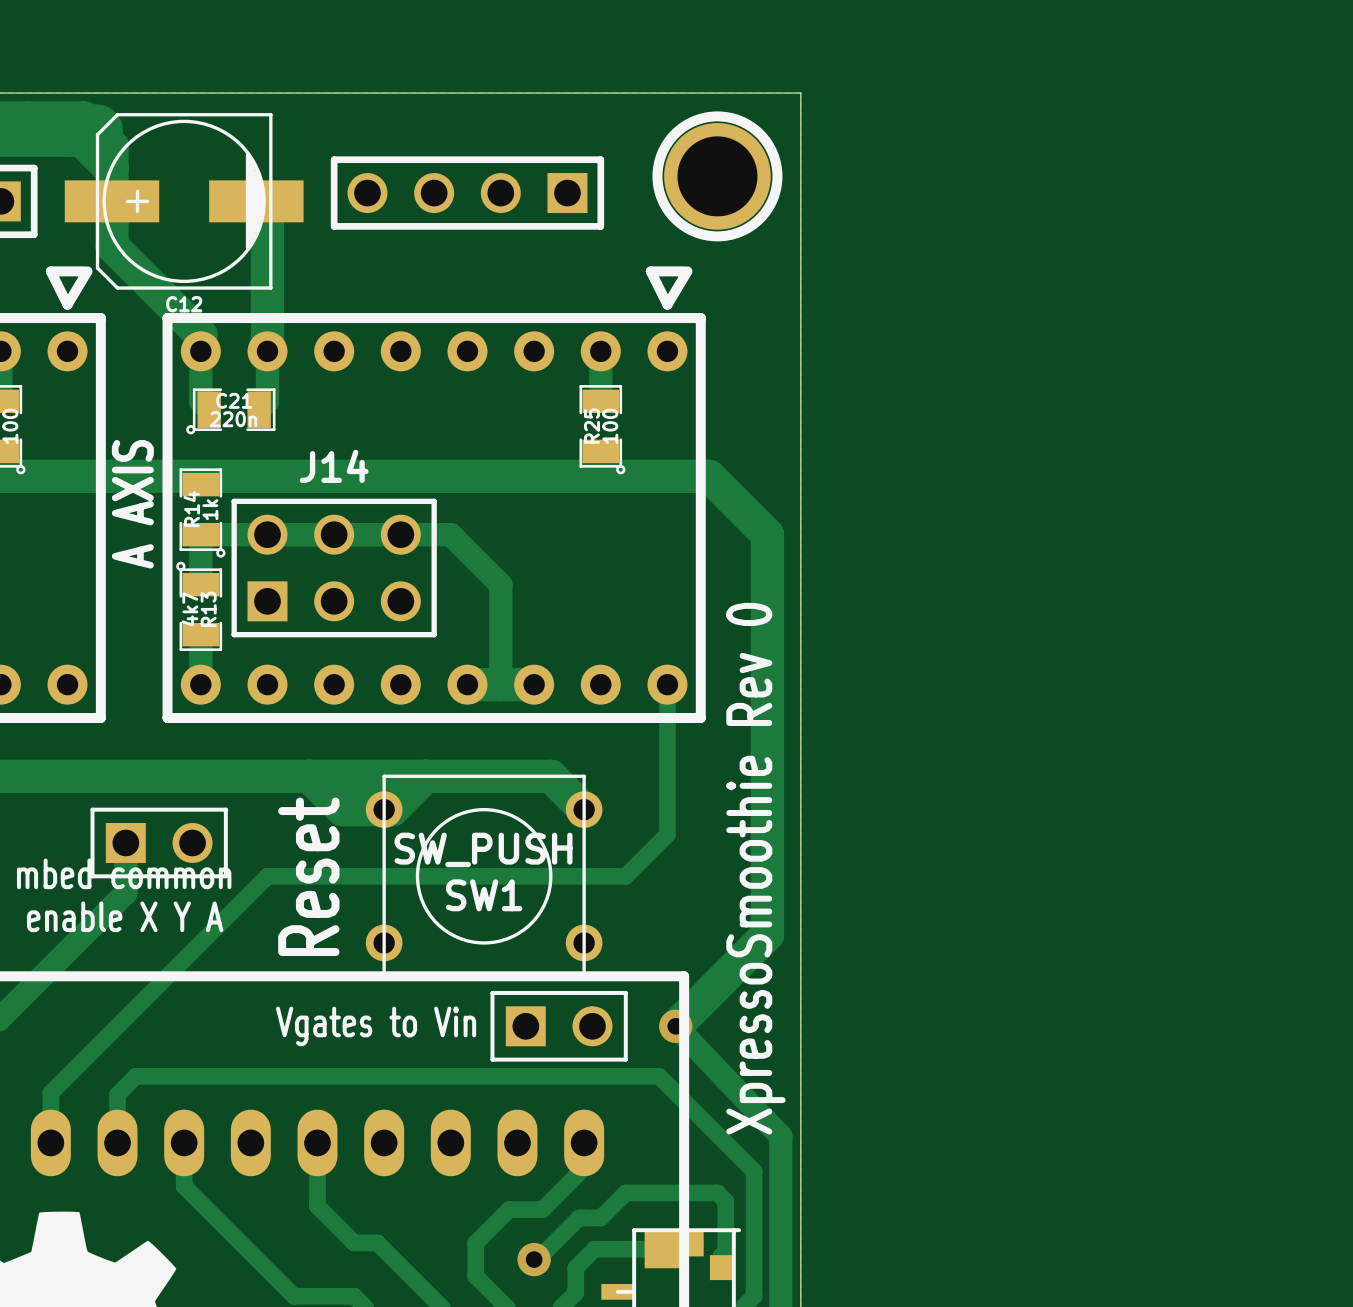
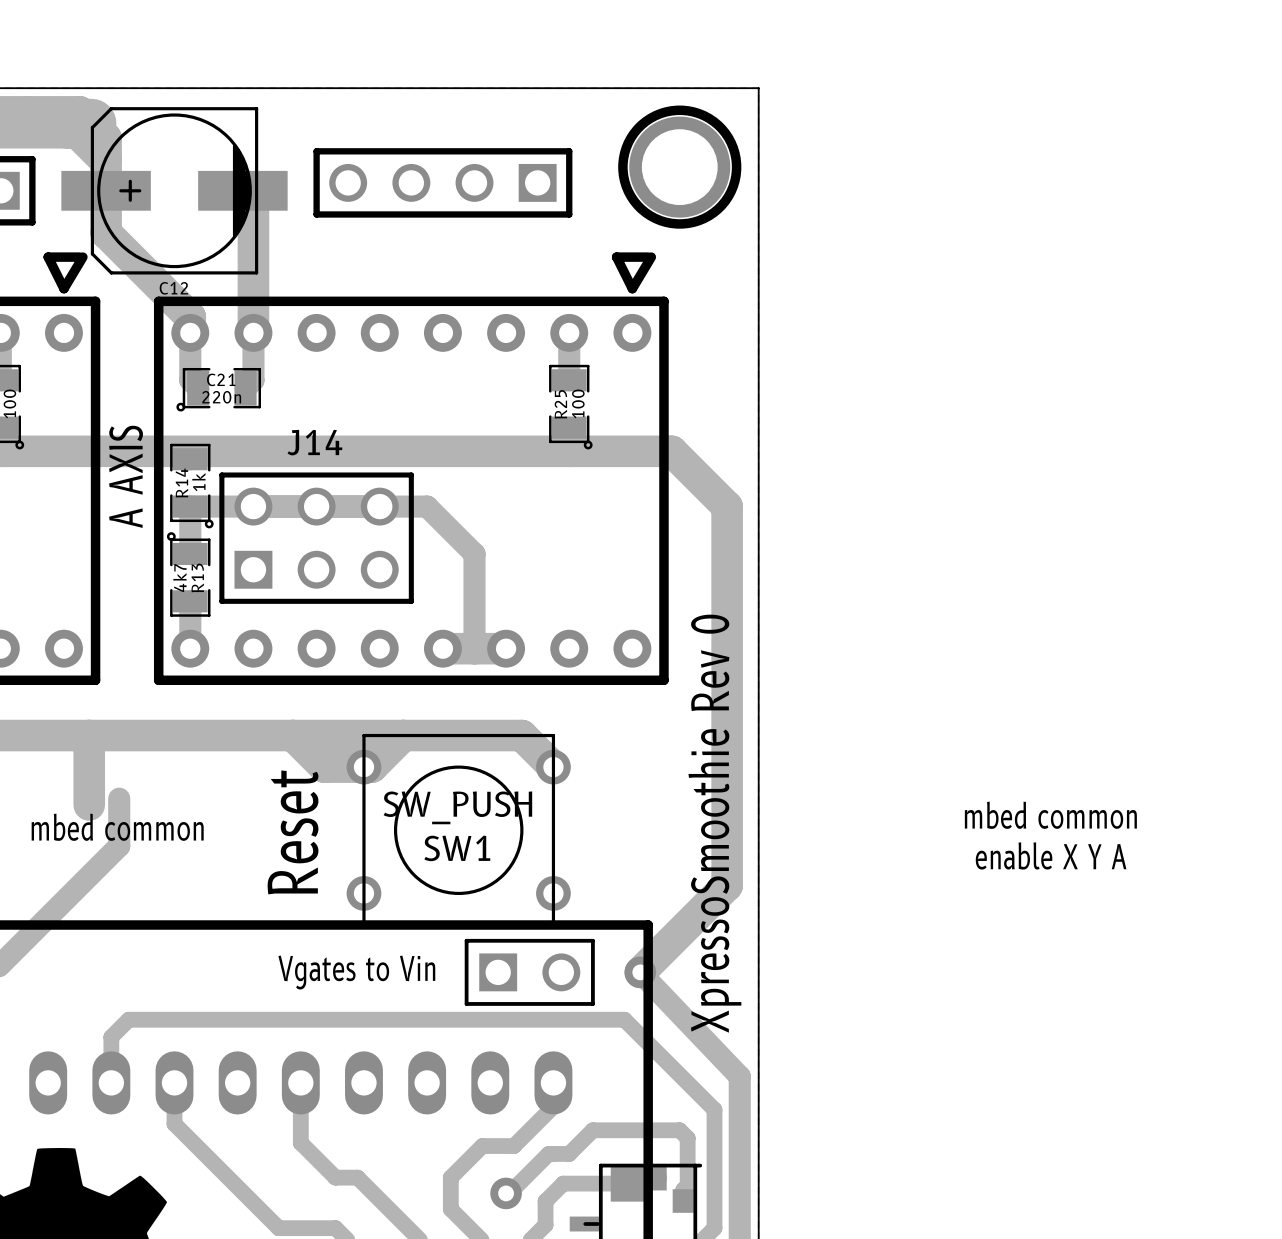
track: (667, 684) (667, 834) (625, 876) (267, 876) (50, 1092) (50, 1142) -> none
track: none -> (89, 735) (89, 805)
part: (159, 842) -> none
text: none -> mbed common (1050, 815)
text: none -> enable X Y A (1051, 855)
text: enable X Y A (125, 916) -> none

